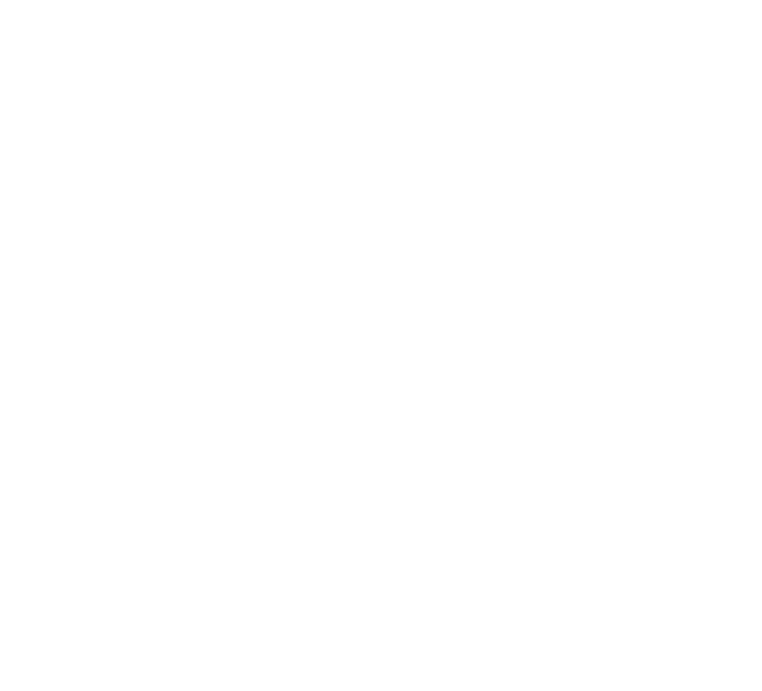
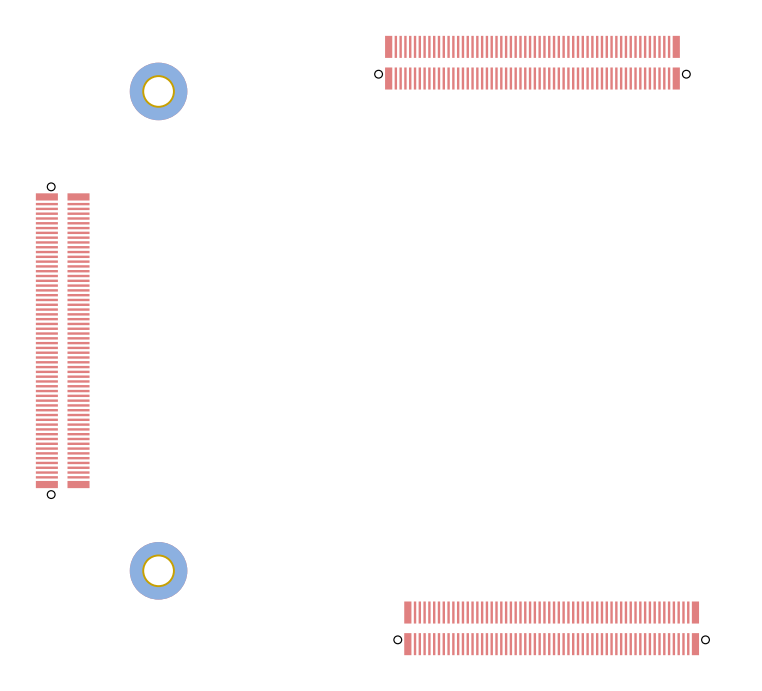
part: none -> (532, 62)
part: none -> (158, 91)
part: none -> (62, 340)
part: none -> (158, 570)
part: none -> (551, 628)

